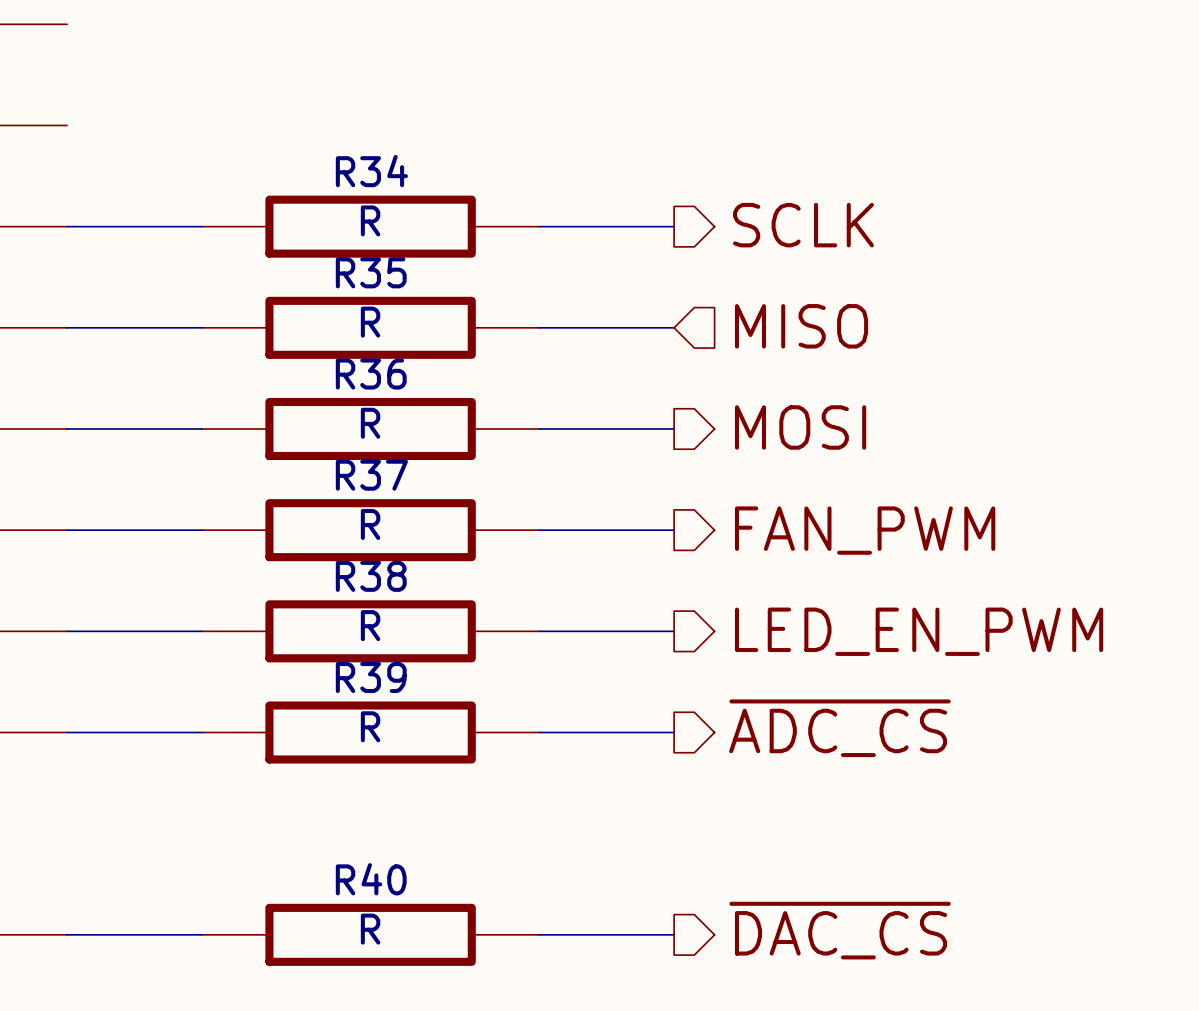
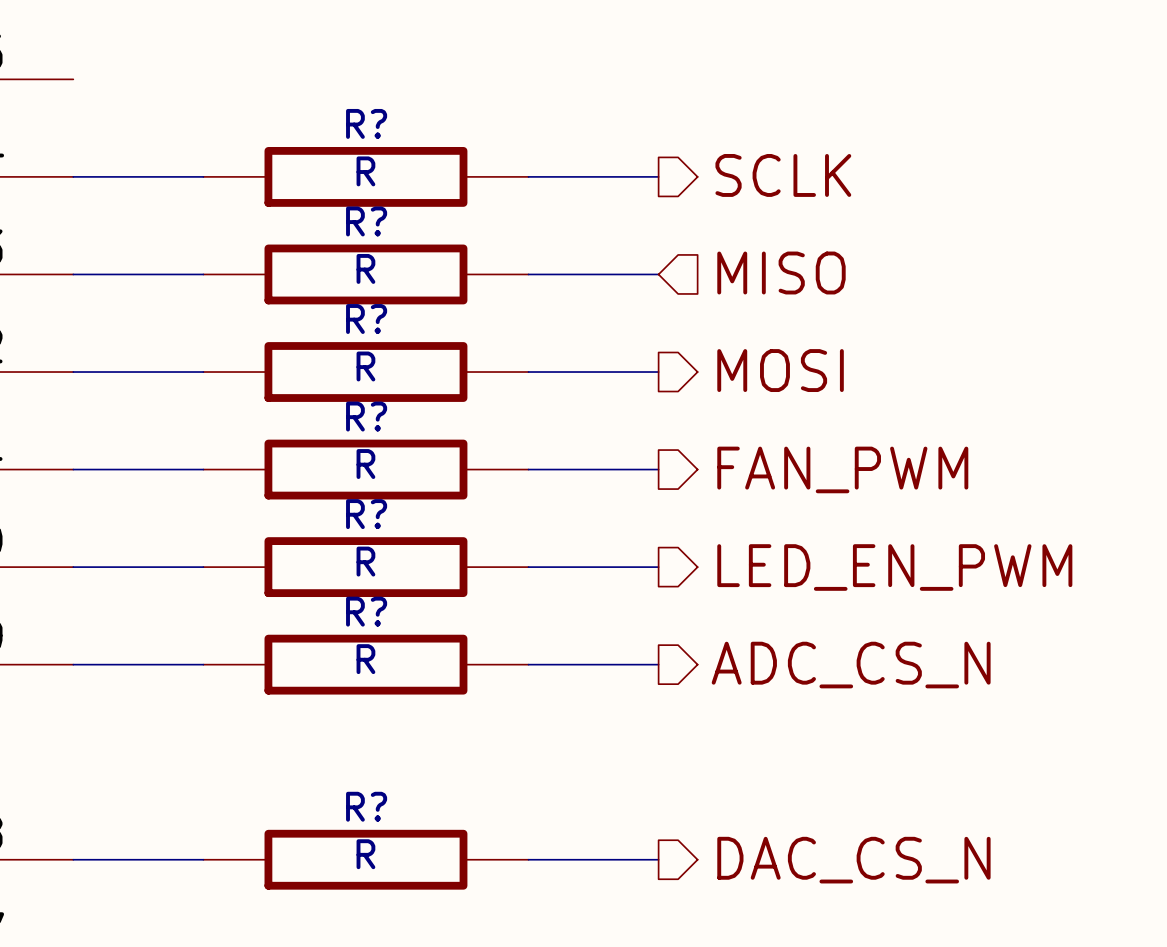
R34 name: R34 (371, 171) -> R? (366, 123)
R35 name: R35 (371, 272) -> R? (366, 221)
R36 name: R36 (371, 374) -> R? (366, 319)
R37 name: R37 (371, 475) -> R? (366, 416)
R38 name: R38 (371, 576) -> R? (366, 514)
R39 name: R39 (371, 677) -> R? (366, 611)
hierarchical label: ~{ADC_CS} (839, 728) -> ADC_CS_N (851, 665)
R40 name: R40 (371, 879) -> R? (366, 806)
hierarchical label: ~{DAC_CS} (840, 930) -> DAC_CS_N (853, 860)

